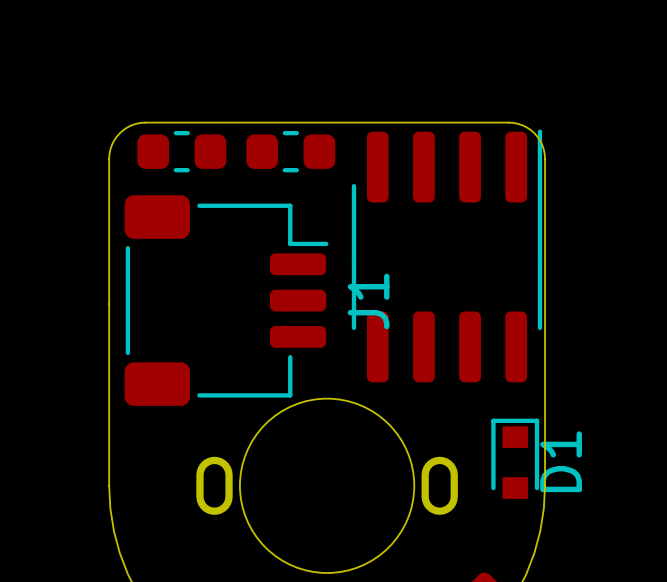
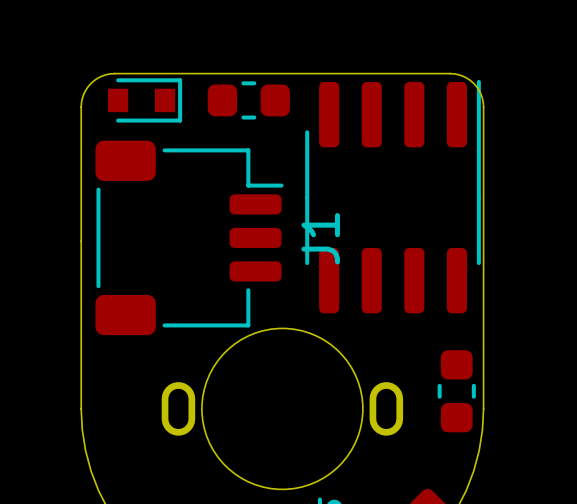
part footprint: [137, 130, 227, 173] -> [108, 78, 183, 123]
D1: (515, 458) -> none
part: none -> (456, 391)

